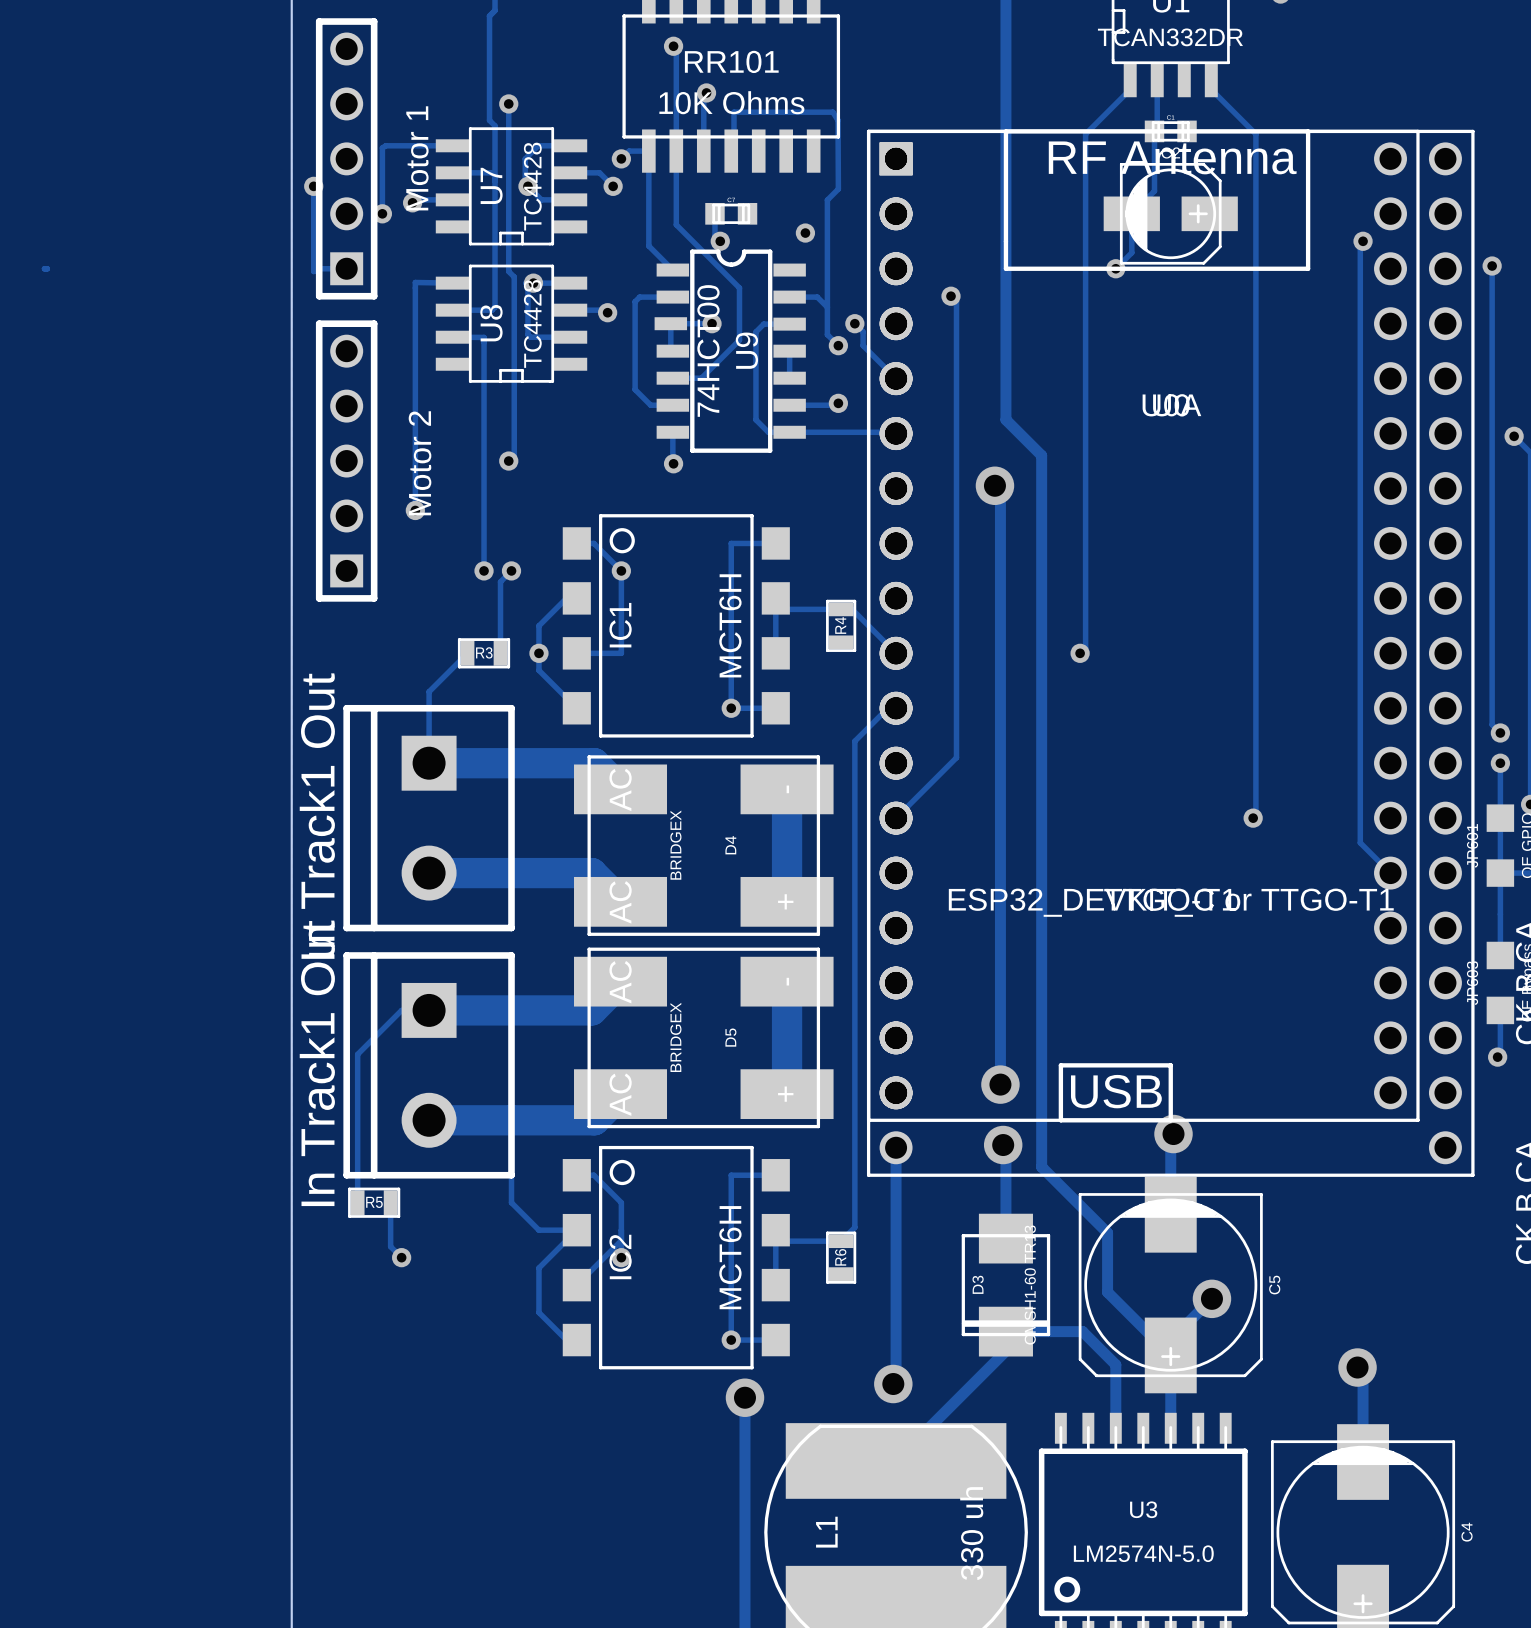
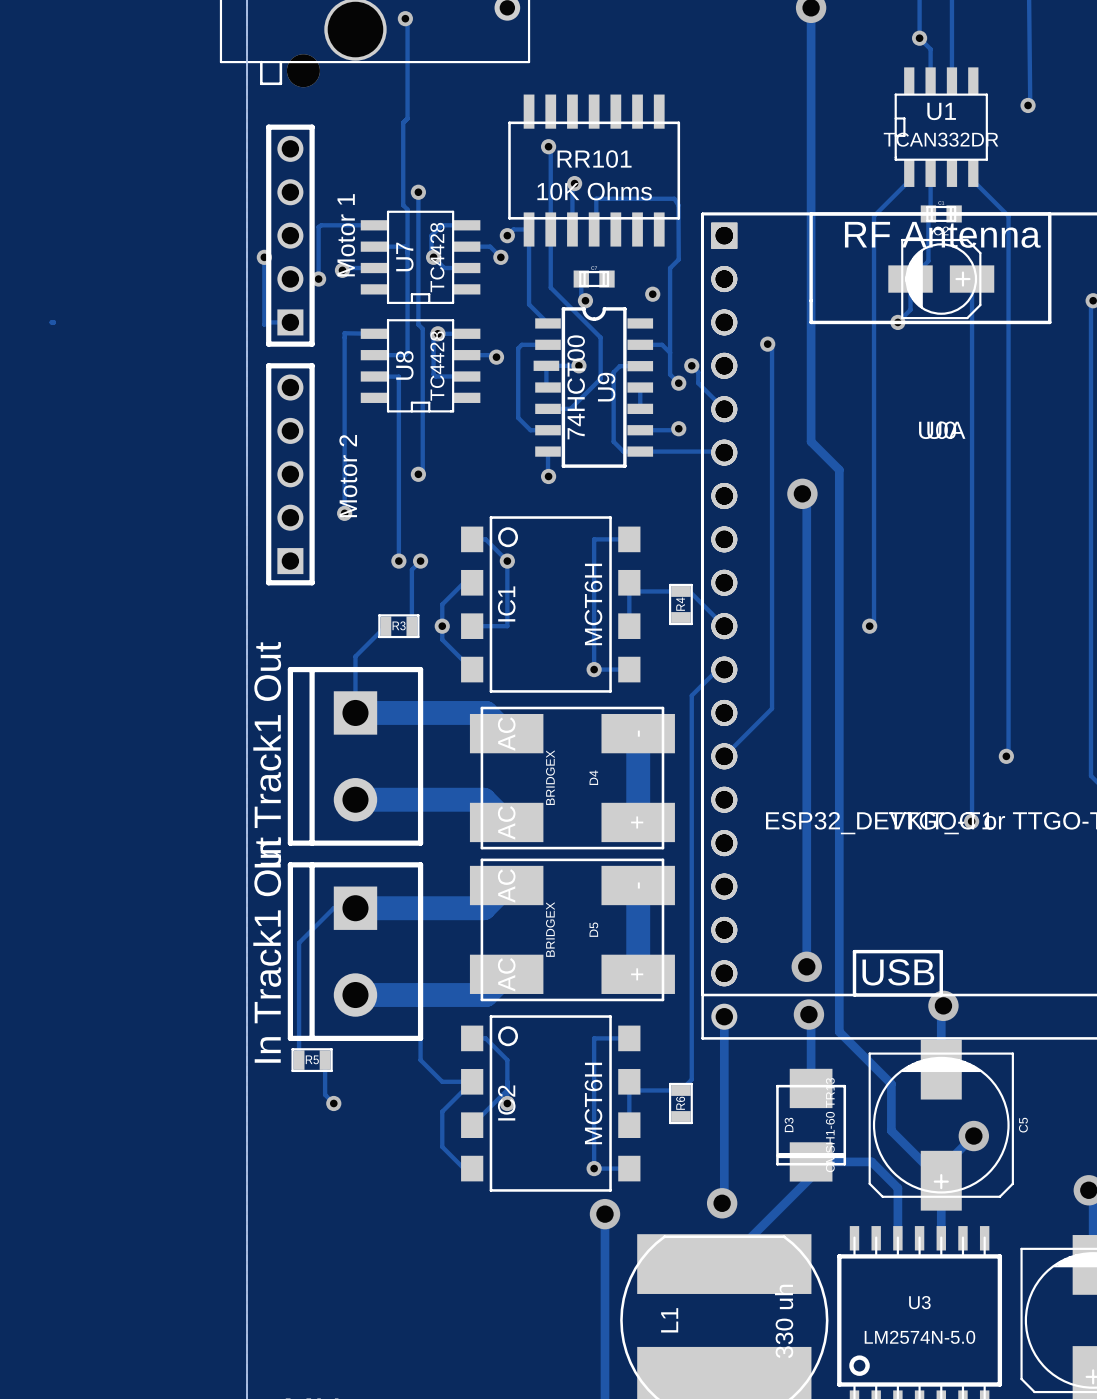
track: none -> (972, 279) (971, 821)
via: none -> (971, 821)

